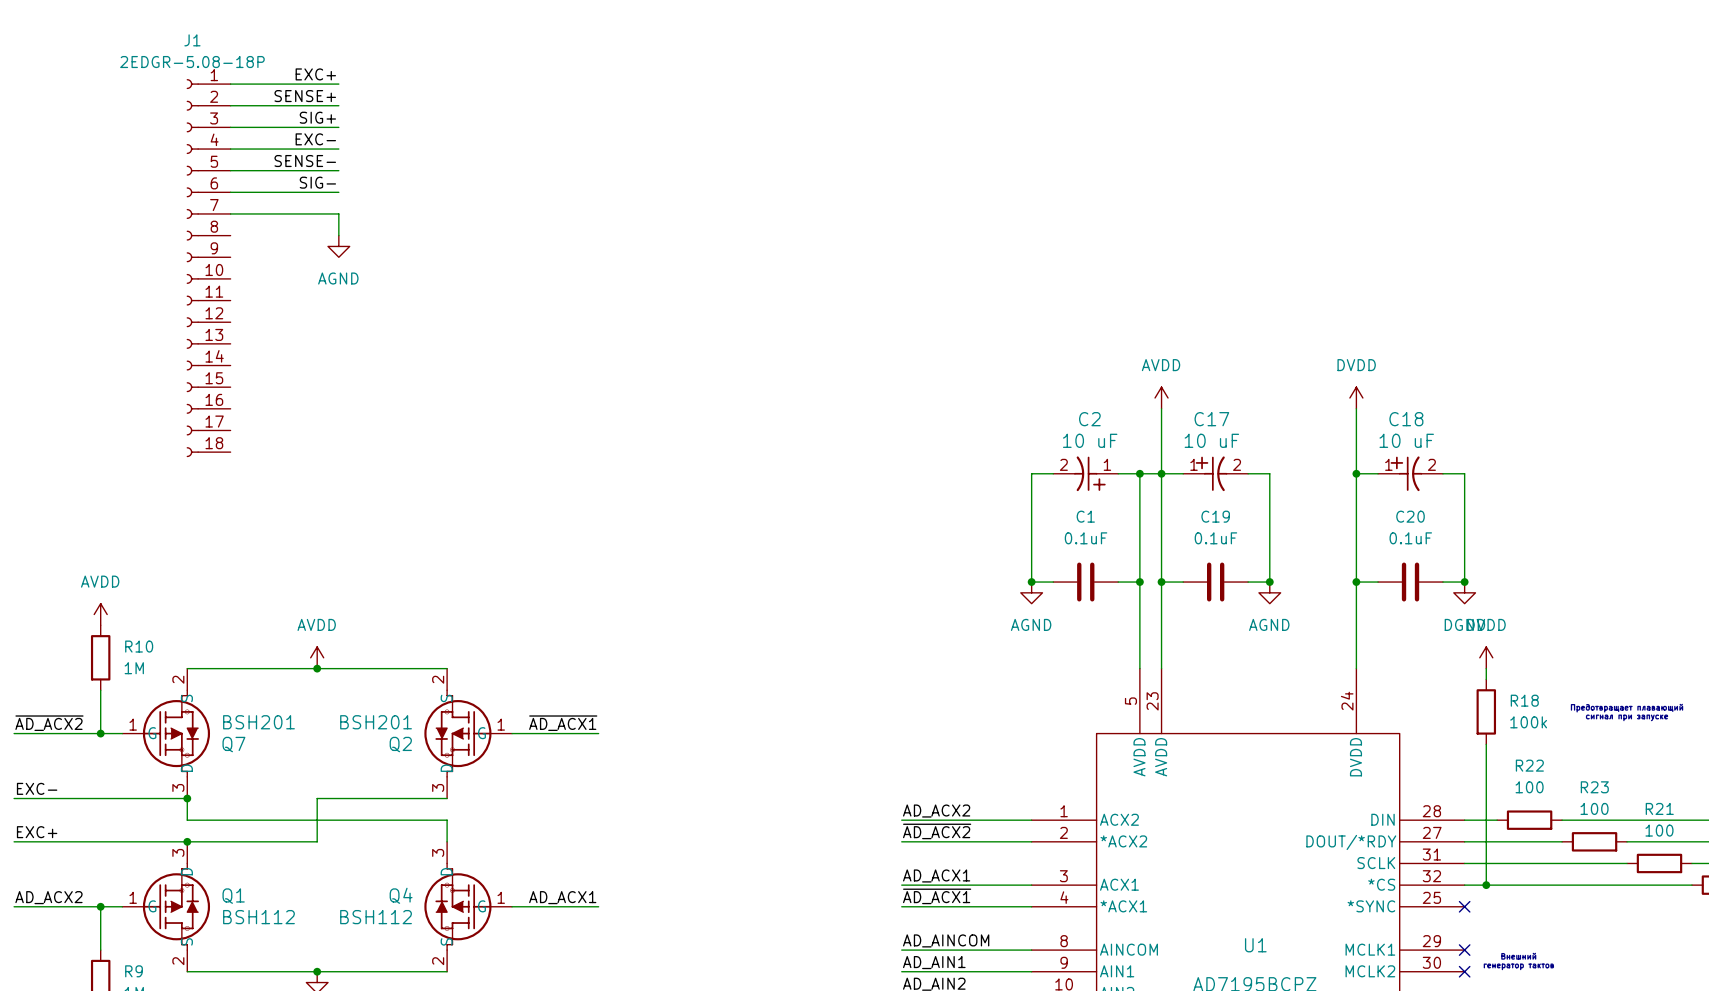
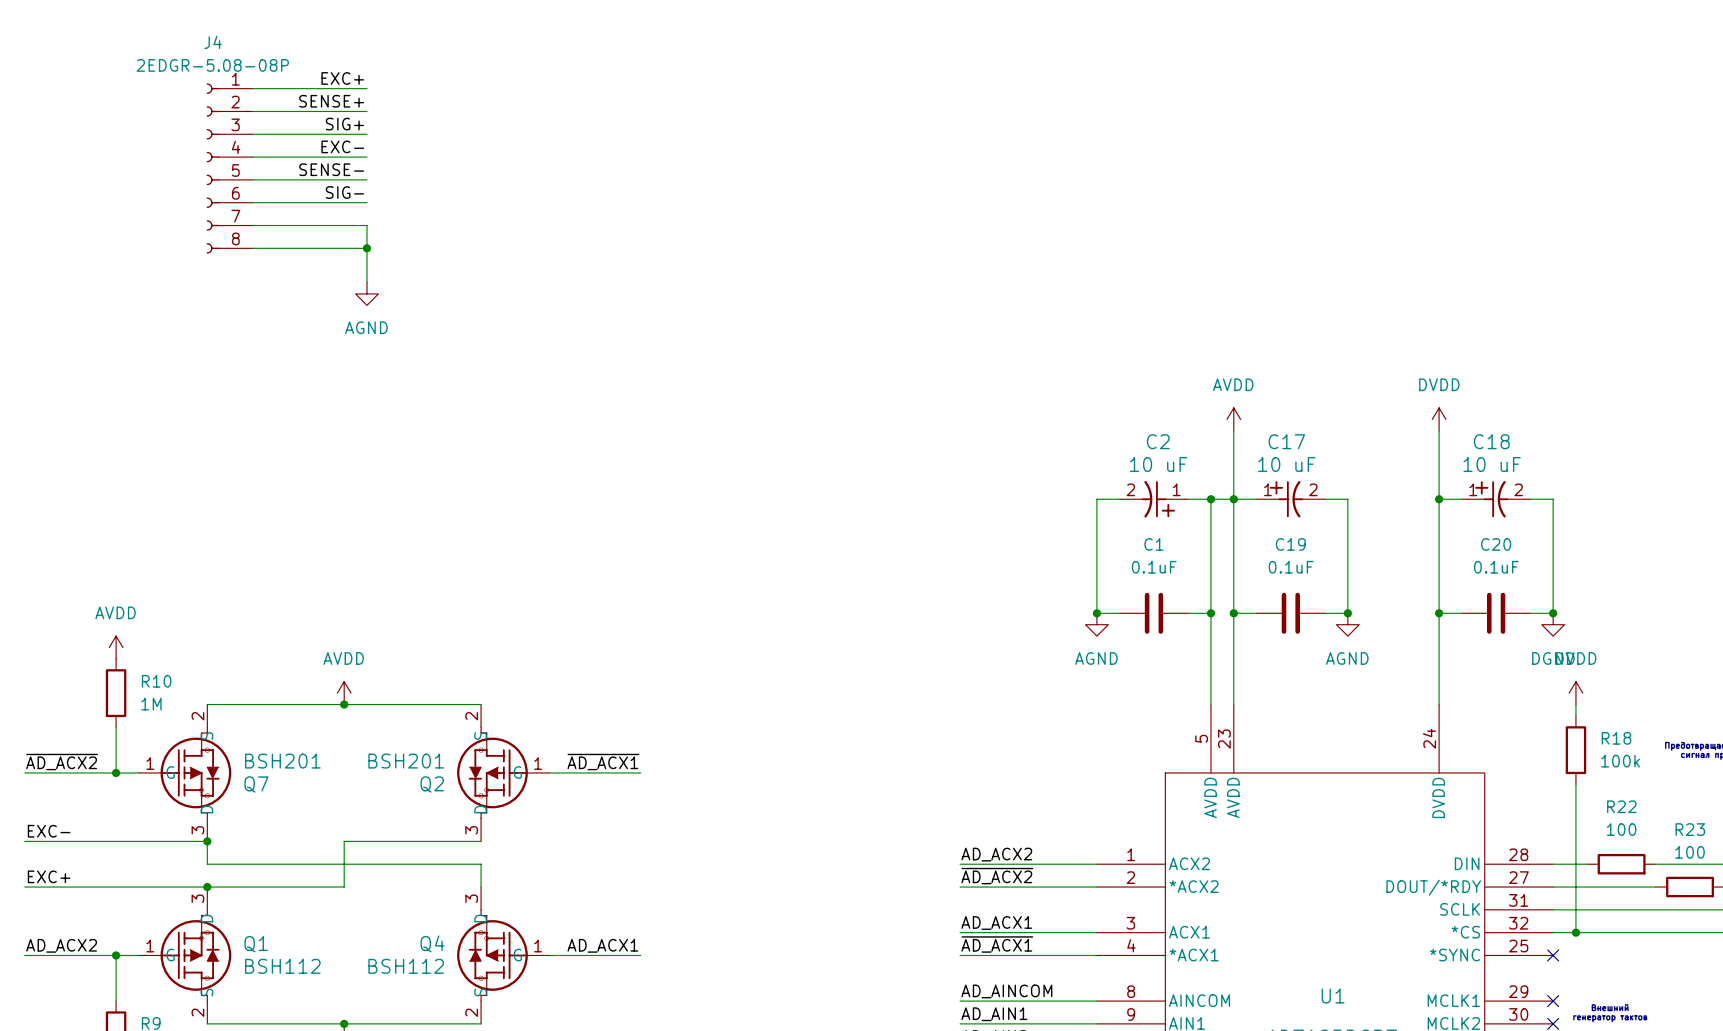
J4: none -> 2EDGR-5.08-08P (229, 168)
wire: none -> (252, 248) (367, 248) (367, 282)
junction: none -> (367, 248)
power symbol position: AGND (338, 246) -> AGND (367, 293)
J1: 2EDGR-5.08-18P (208, 268) -> none

